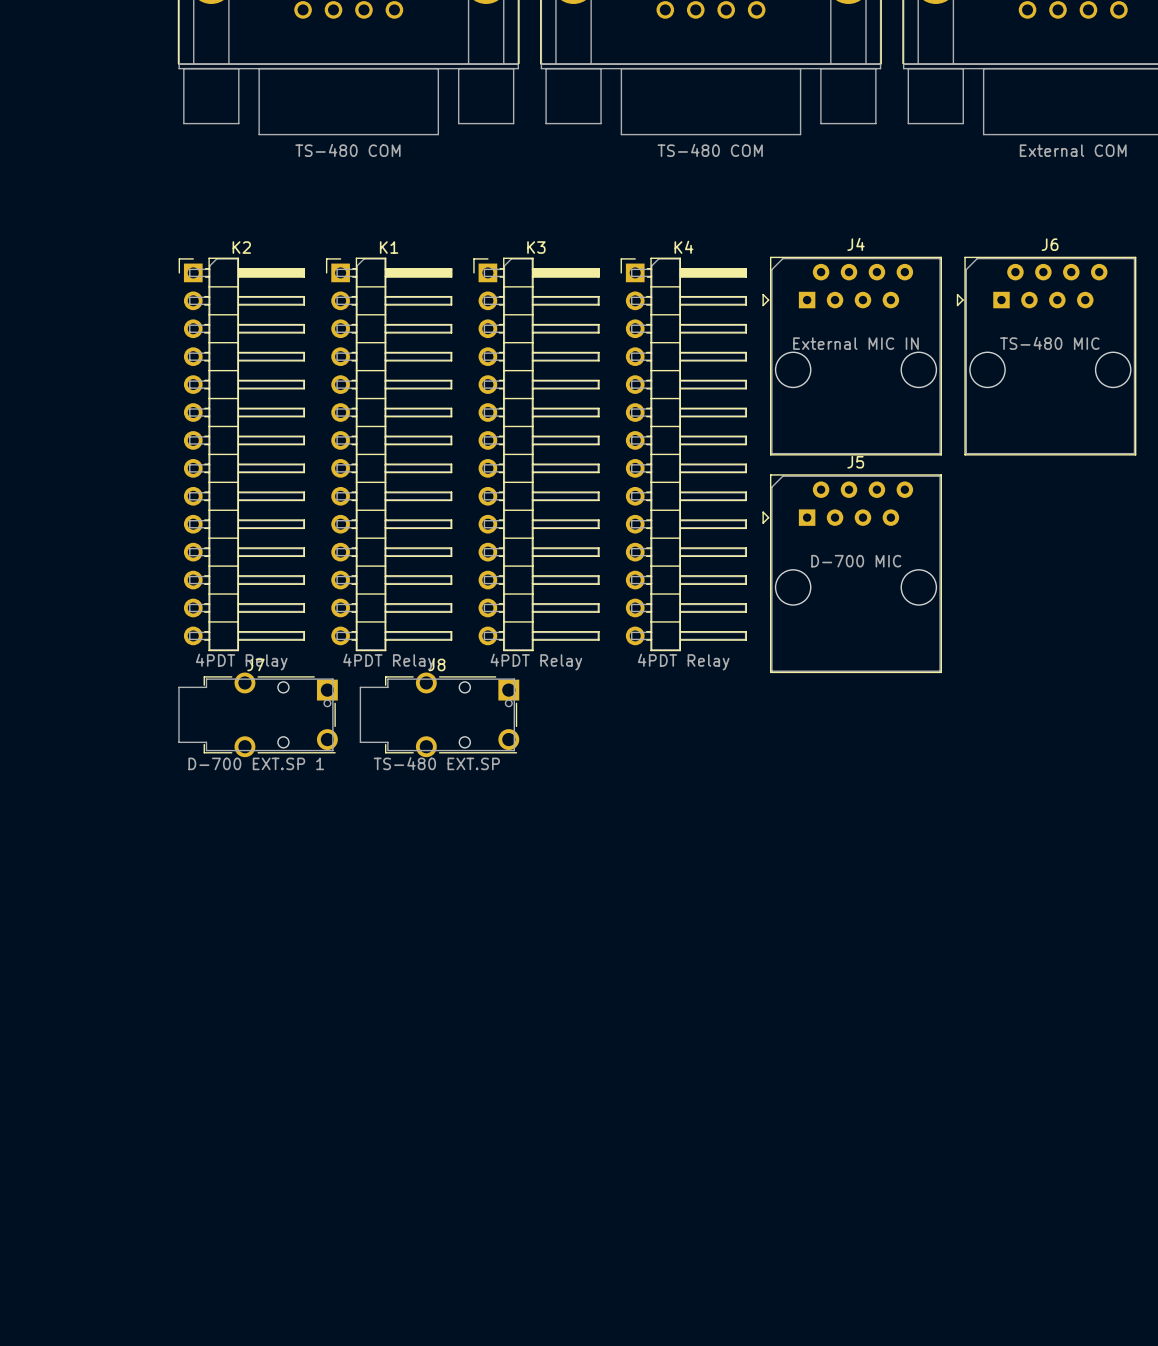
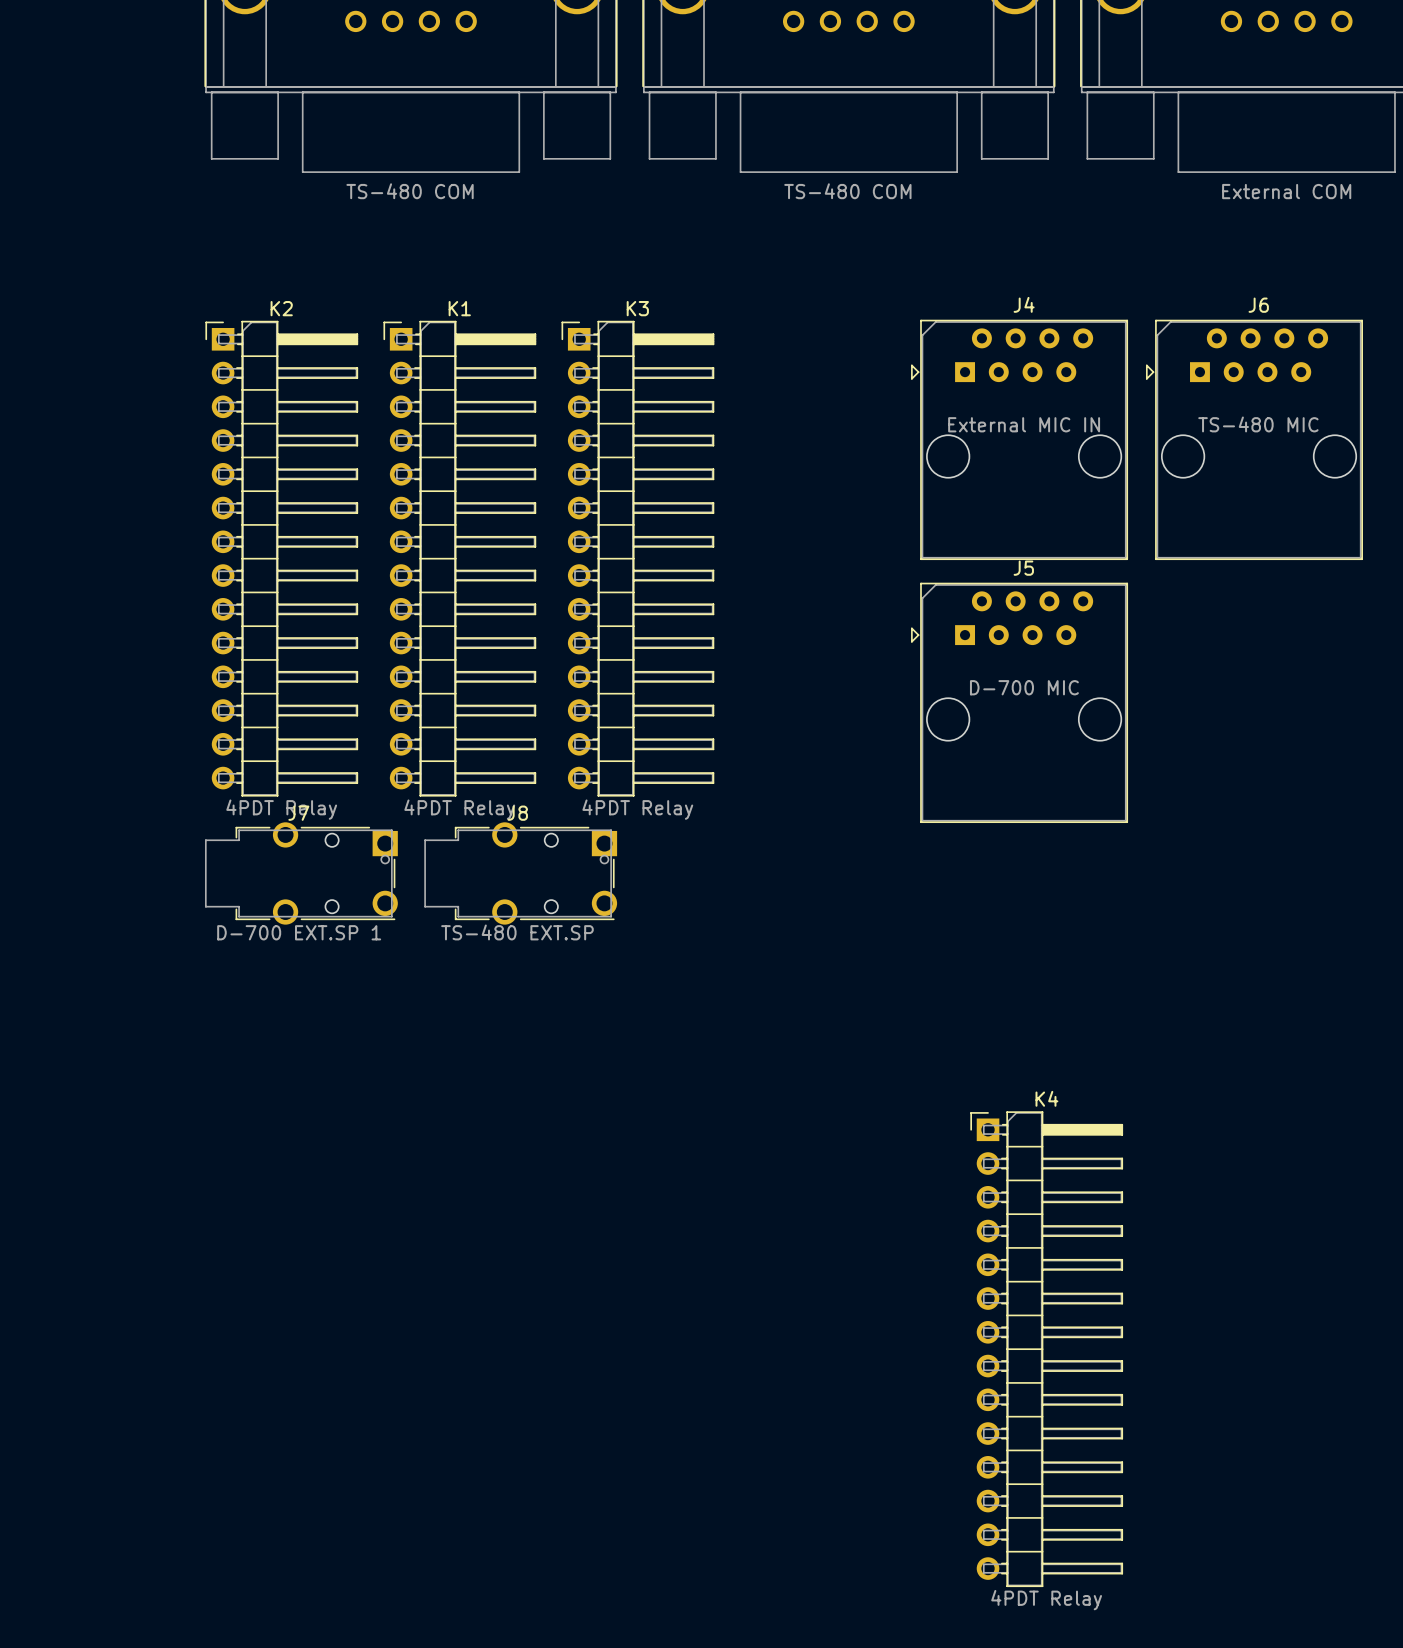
K4 position: (683, 454) -> (1046, 1349)

